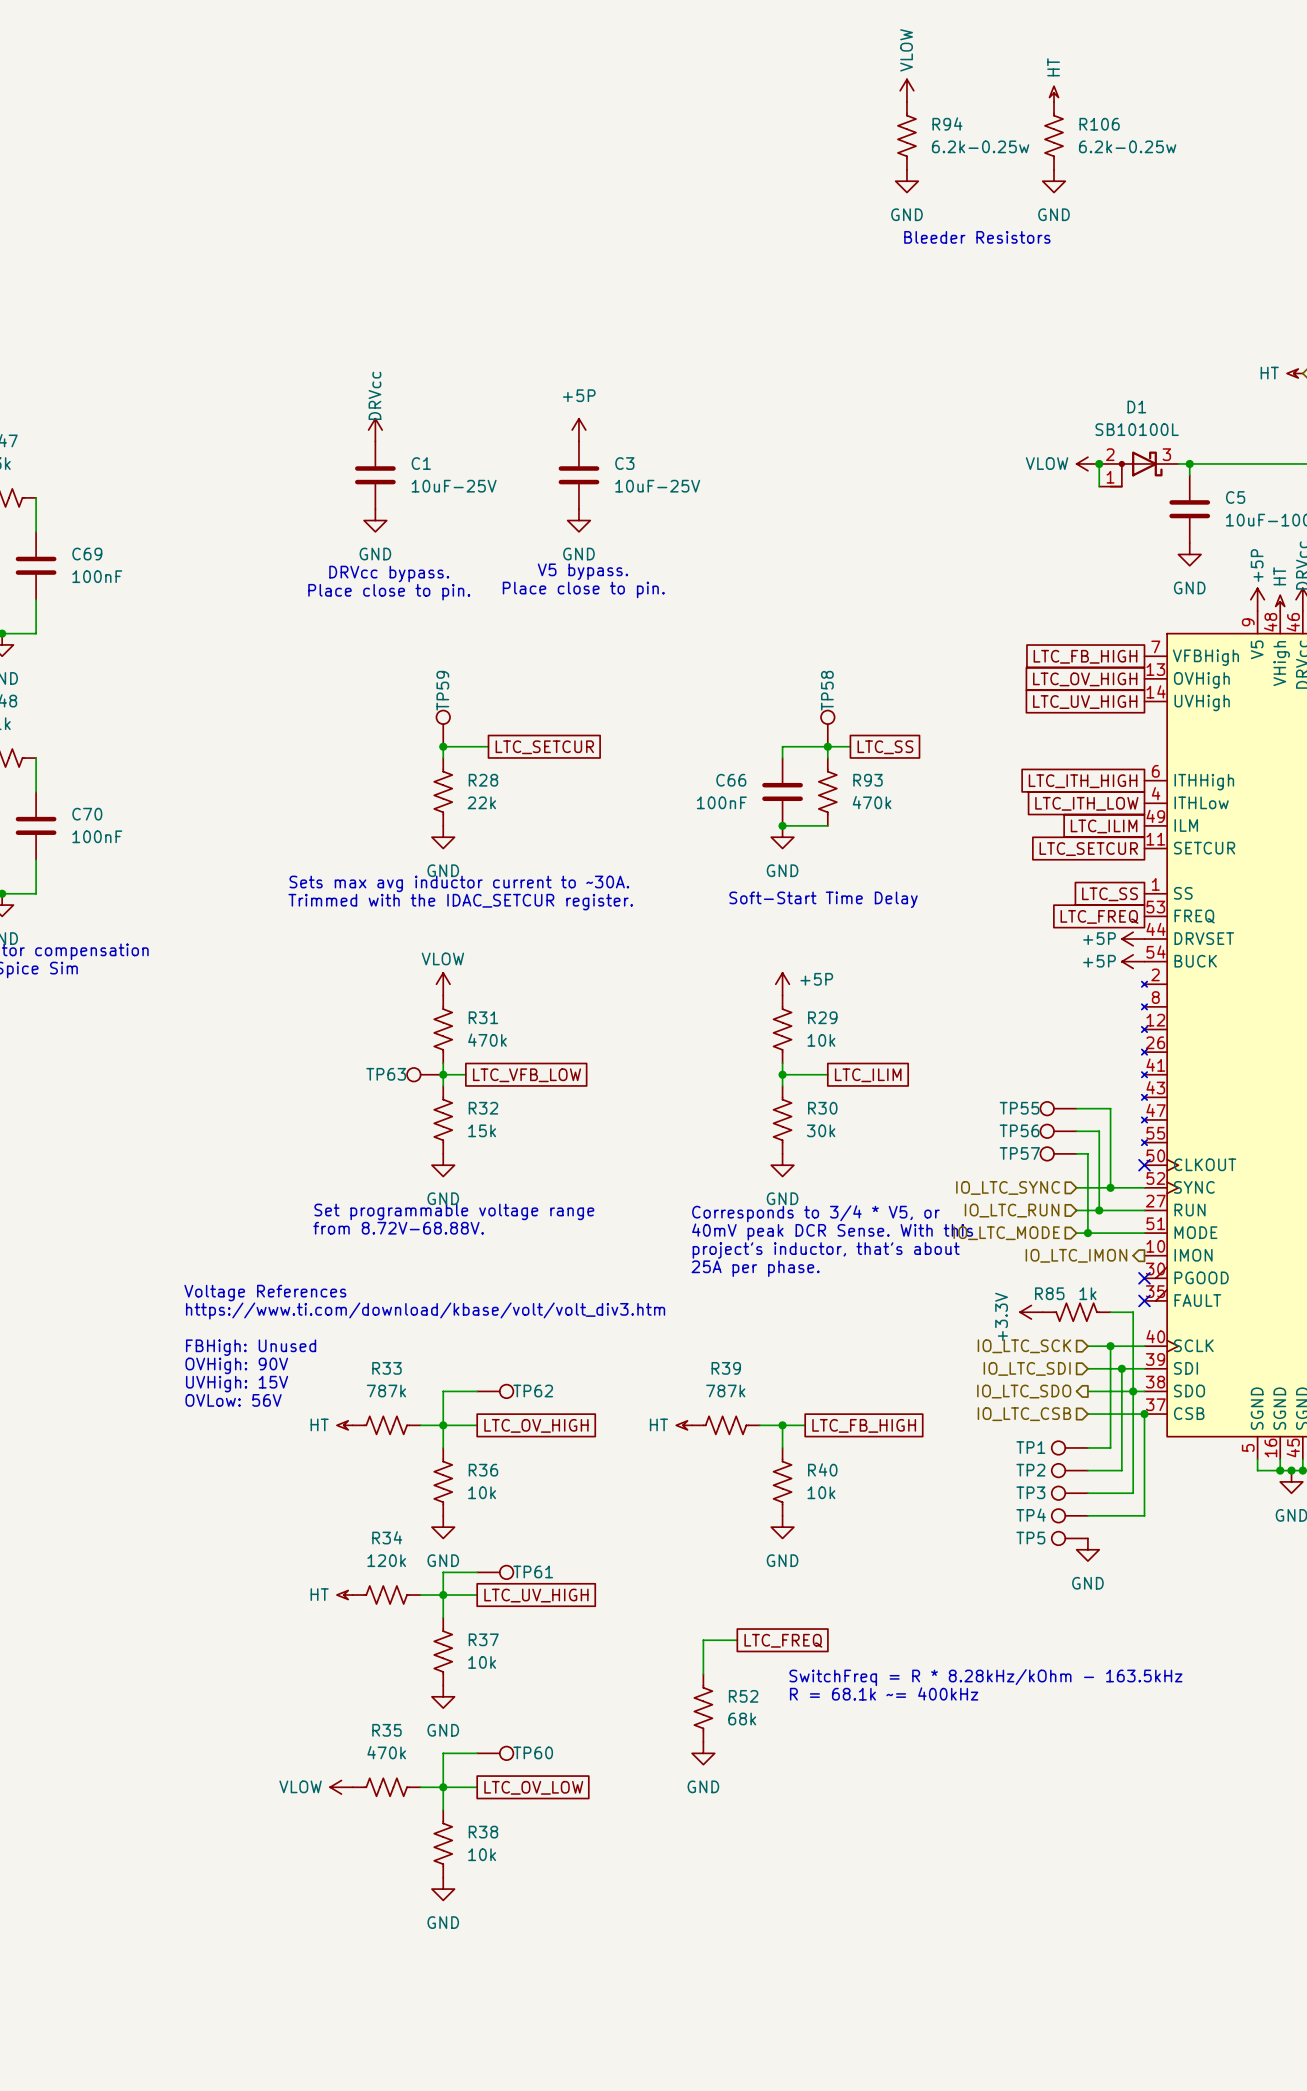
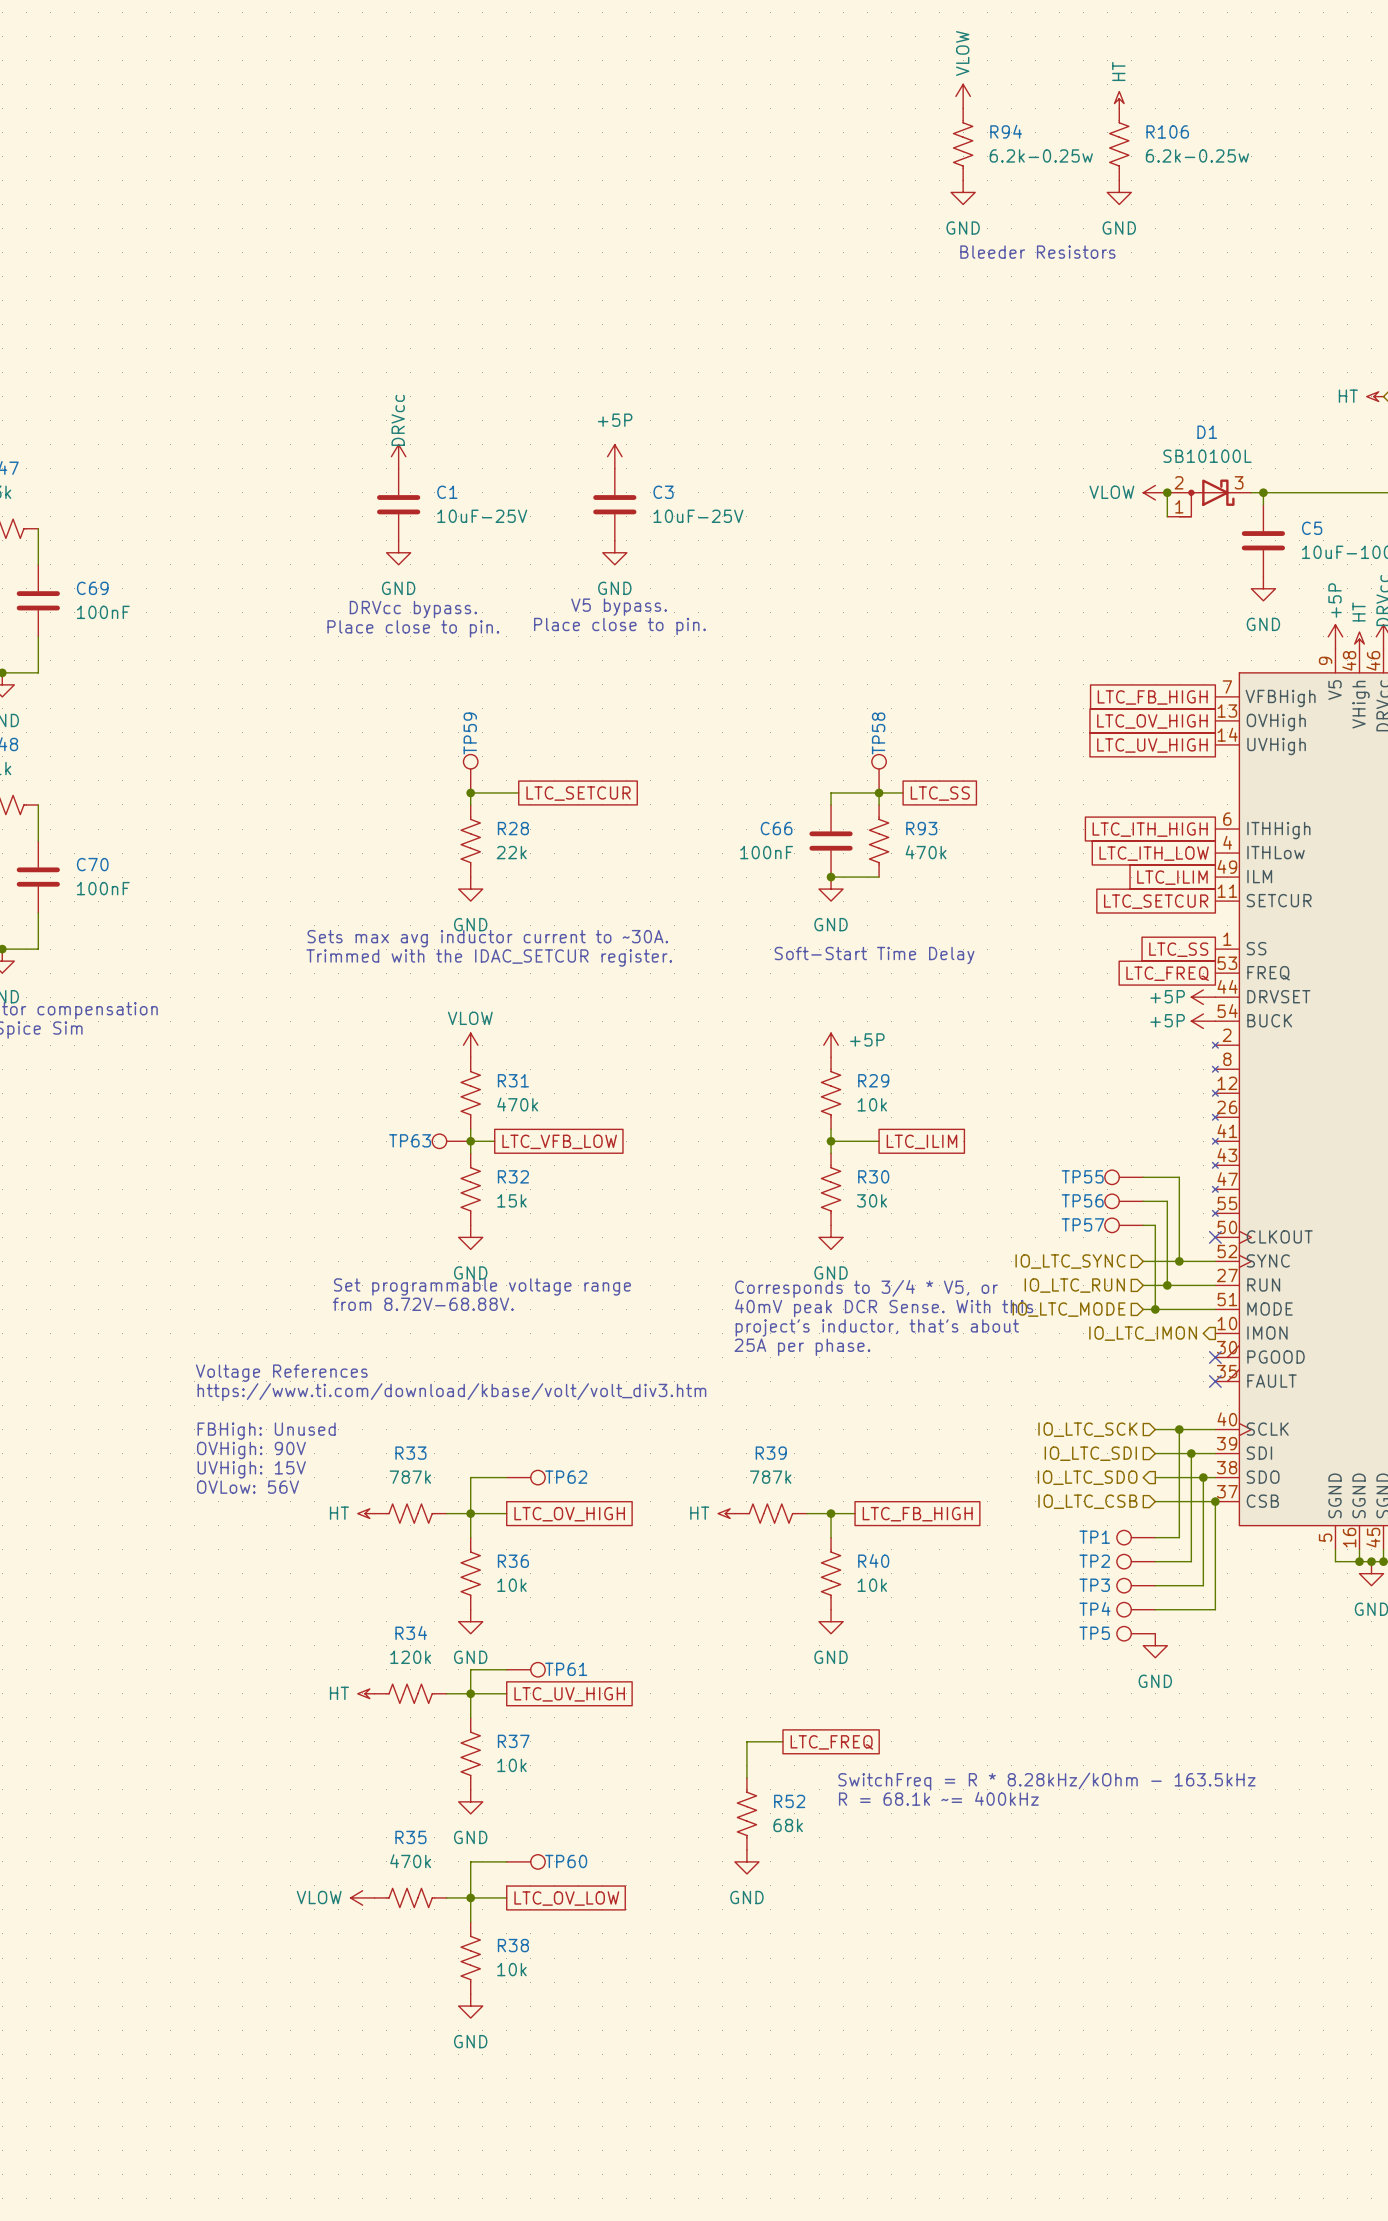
power symbol: +3.3V (1031, 1312) -> none
R85: 1k (1076, 1312) -> none
wire: (1110, 1312) (1133, 1312) (1133, 1391) -> none

